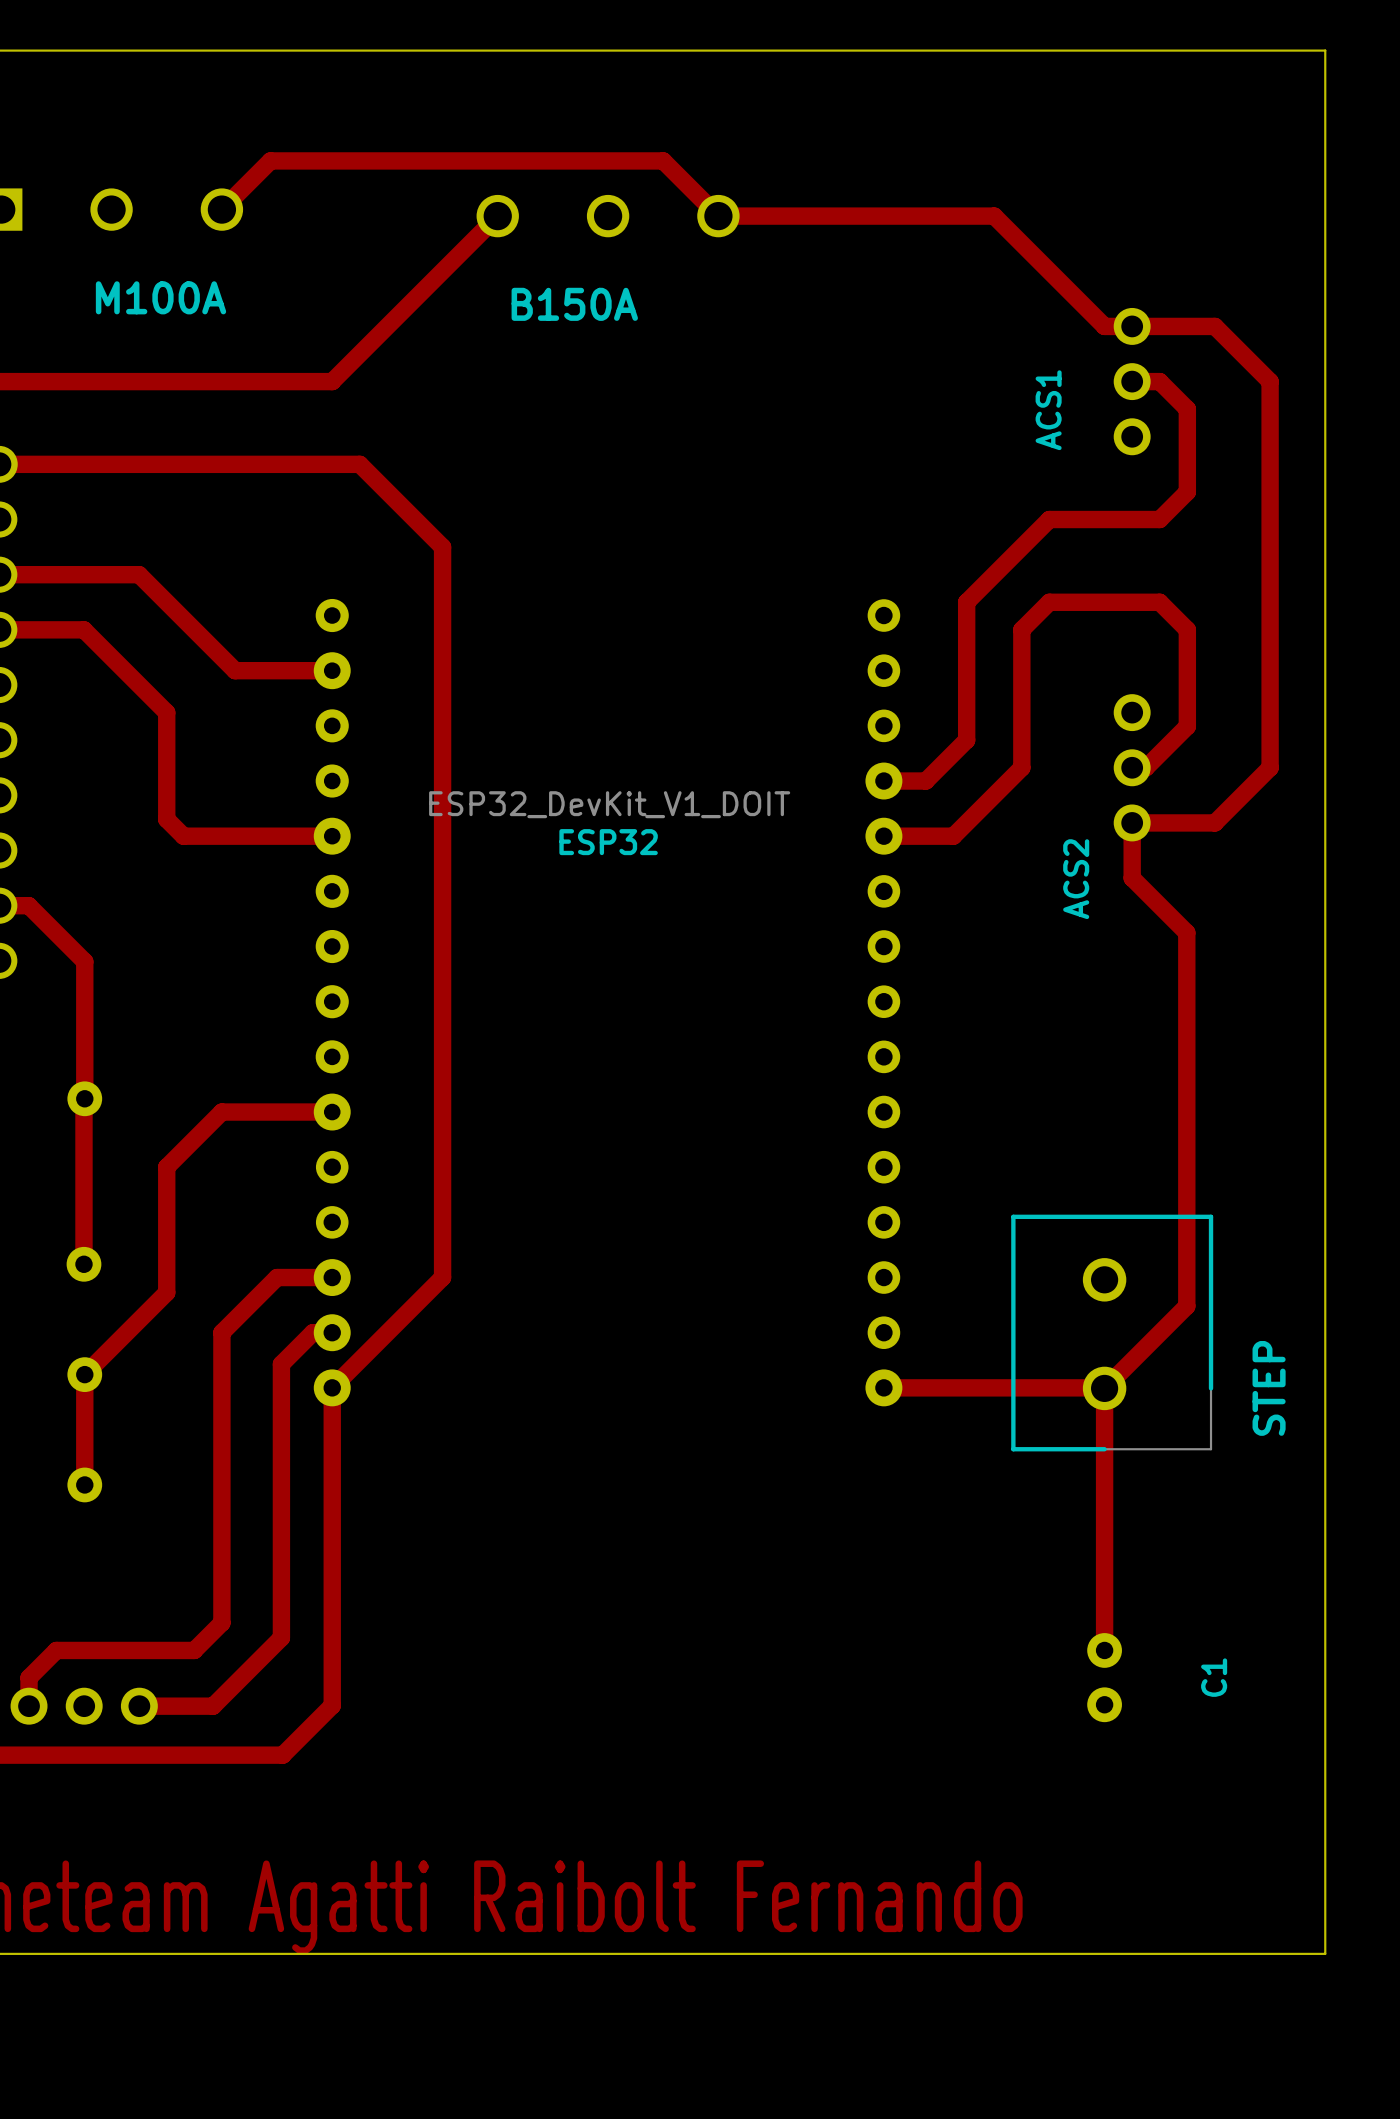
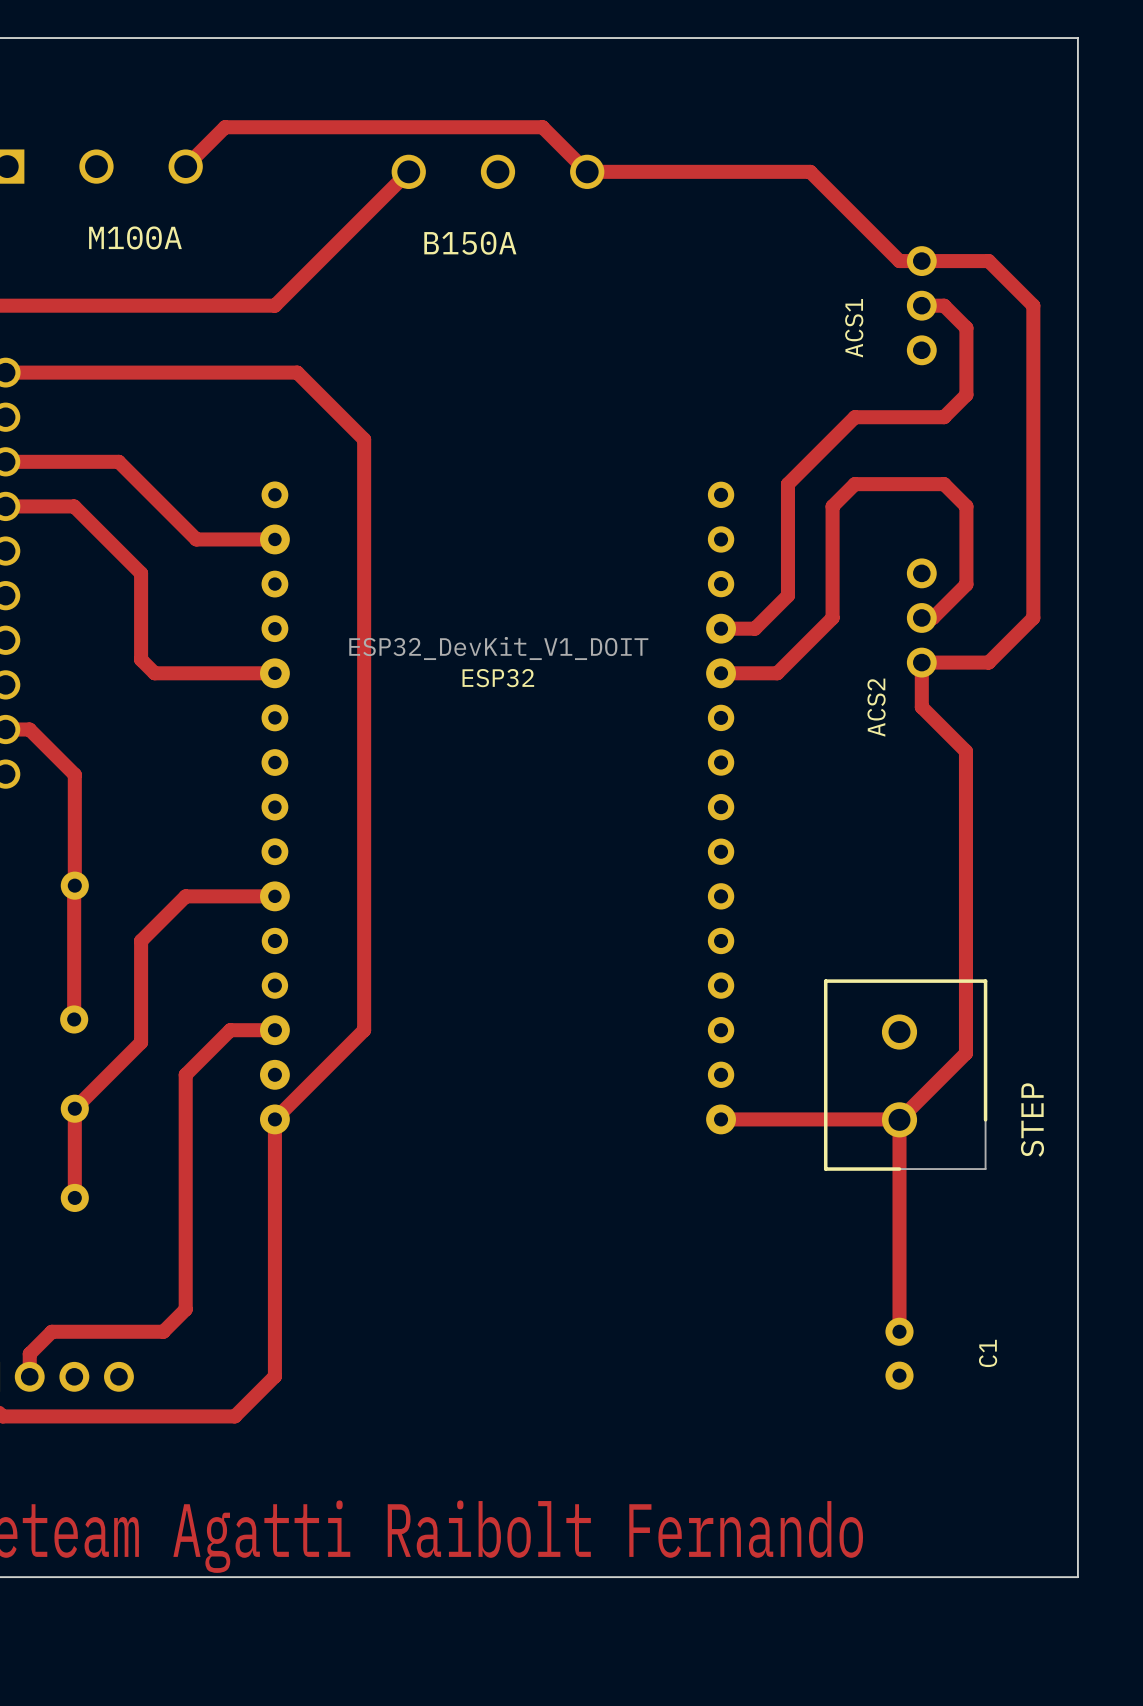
top track: (332, 1332) (312, 1332) (281, 1364) (281, 1637) (213, 1706) (139, 1706) -> none

